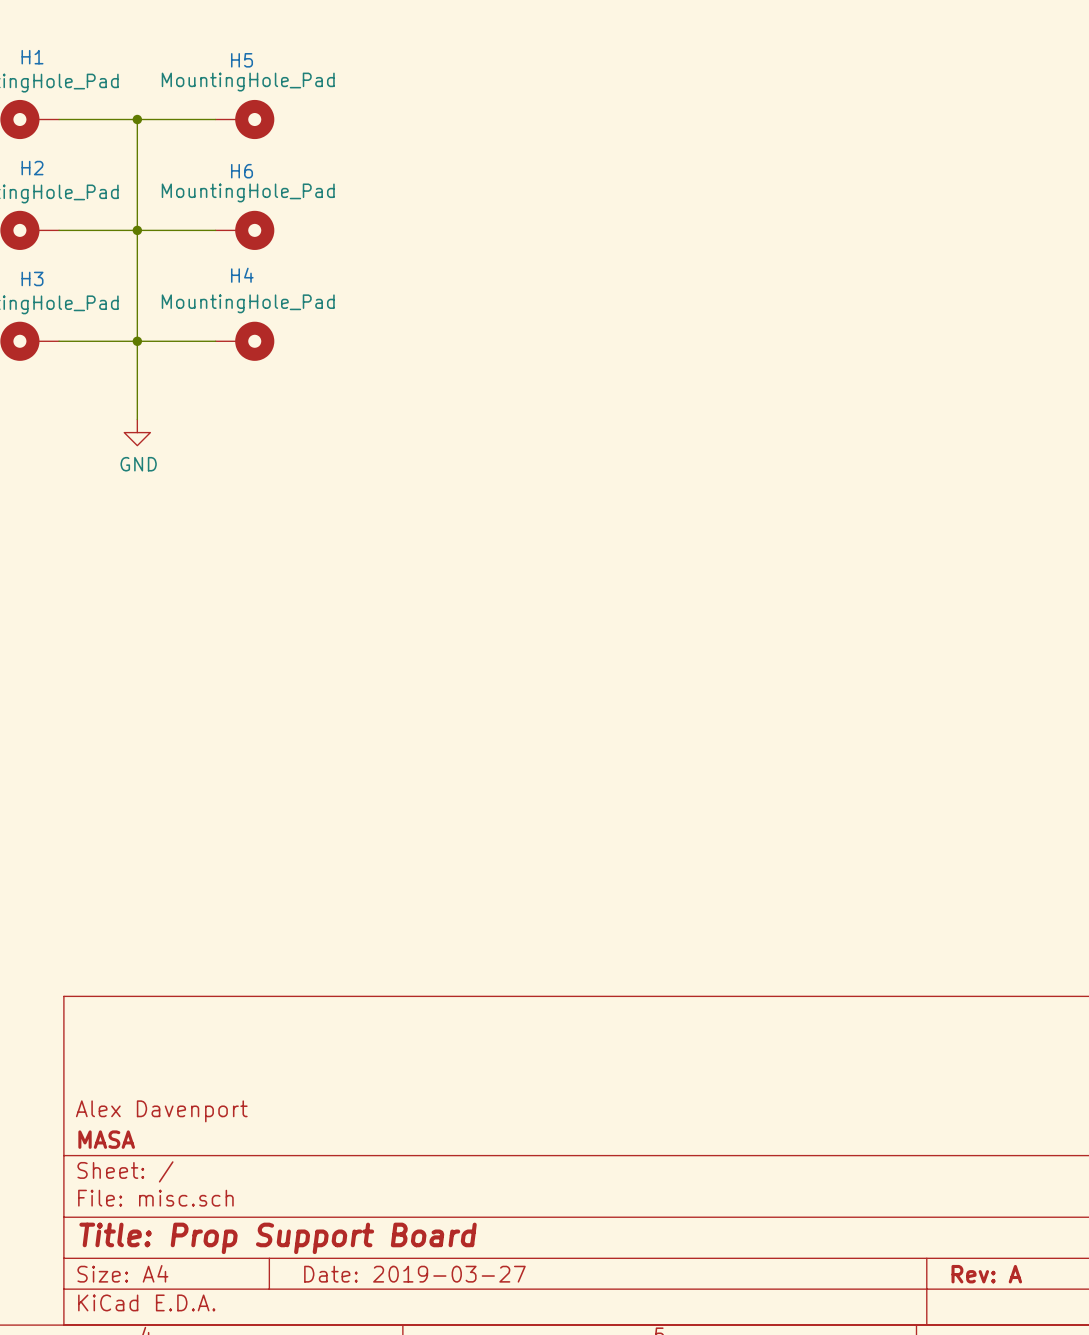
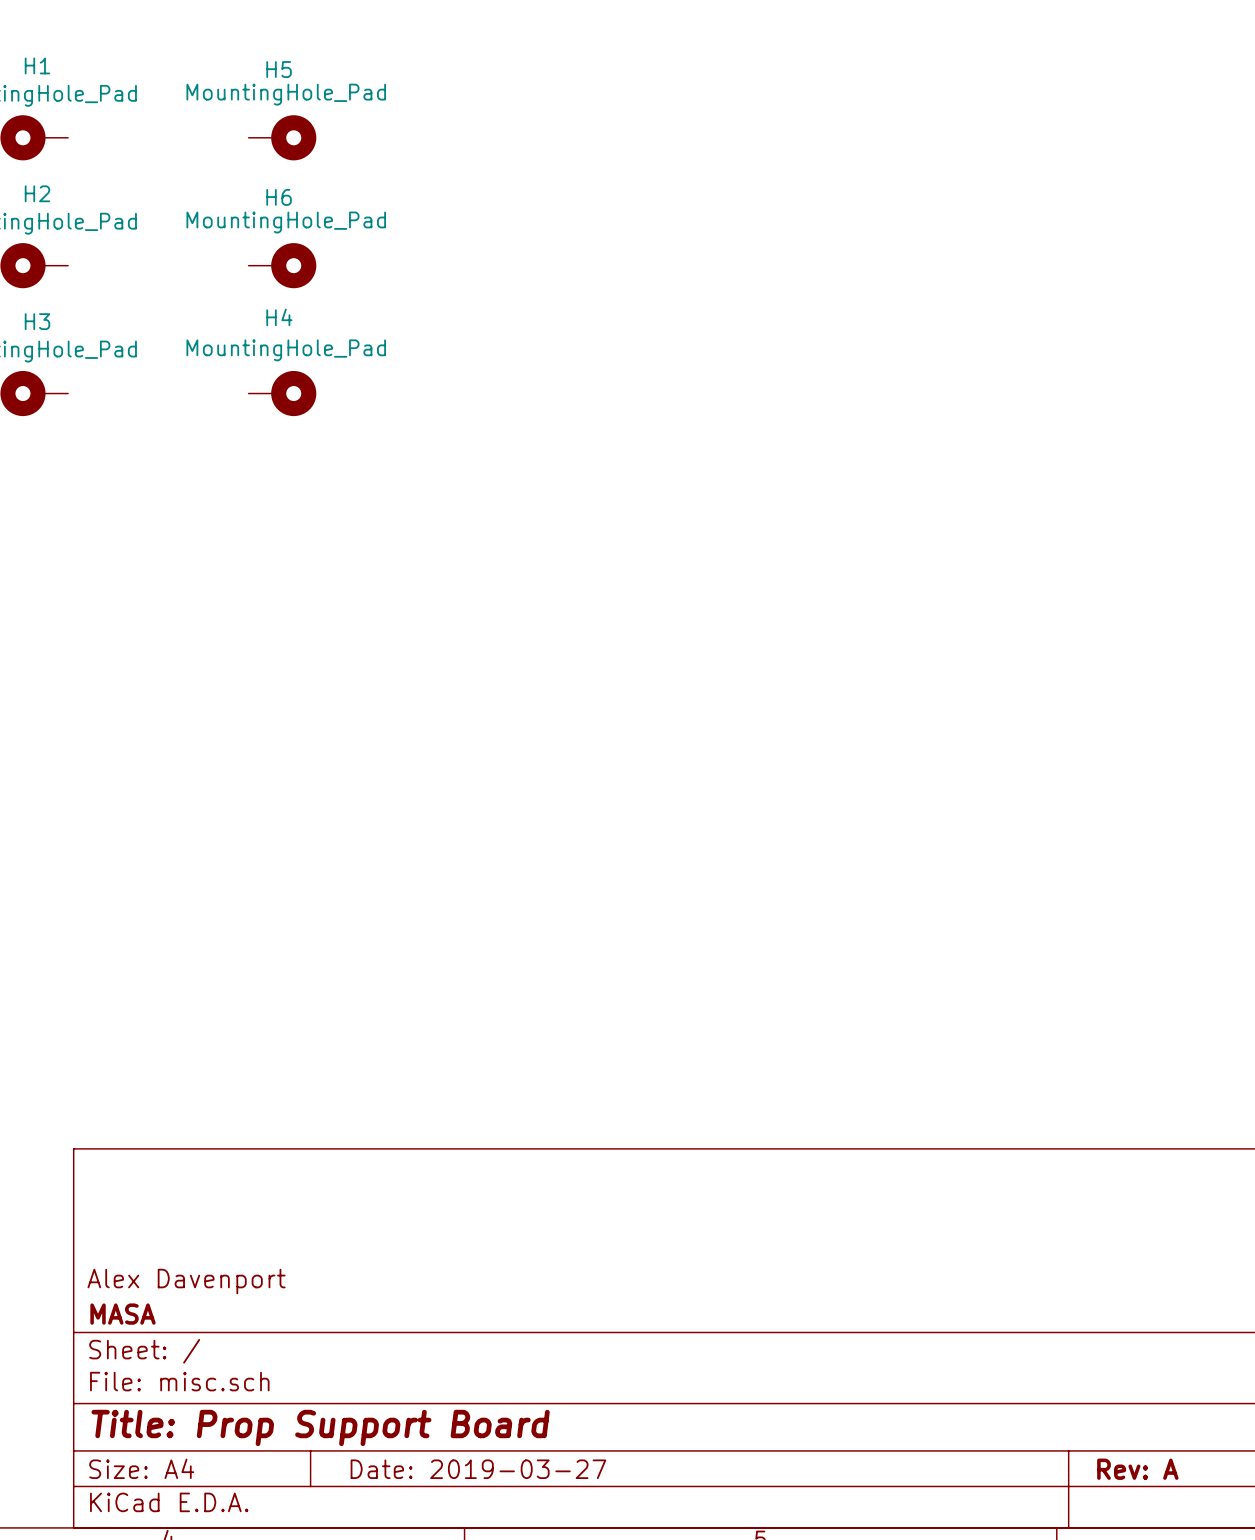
wire: (59, 119) (215, 119) -> none
wire: (137, 119) (137, 419) -> none
junction: (137, 119) -> none
wire: (59, 230) (215, 230) -> none
junction: (137, 230) -> none
wire: (59, 341) (215, 341) -> none
junction: (137, 341) -> none
power symbol: GND (137, 432) -> none

